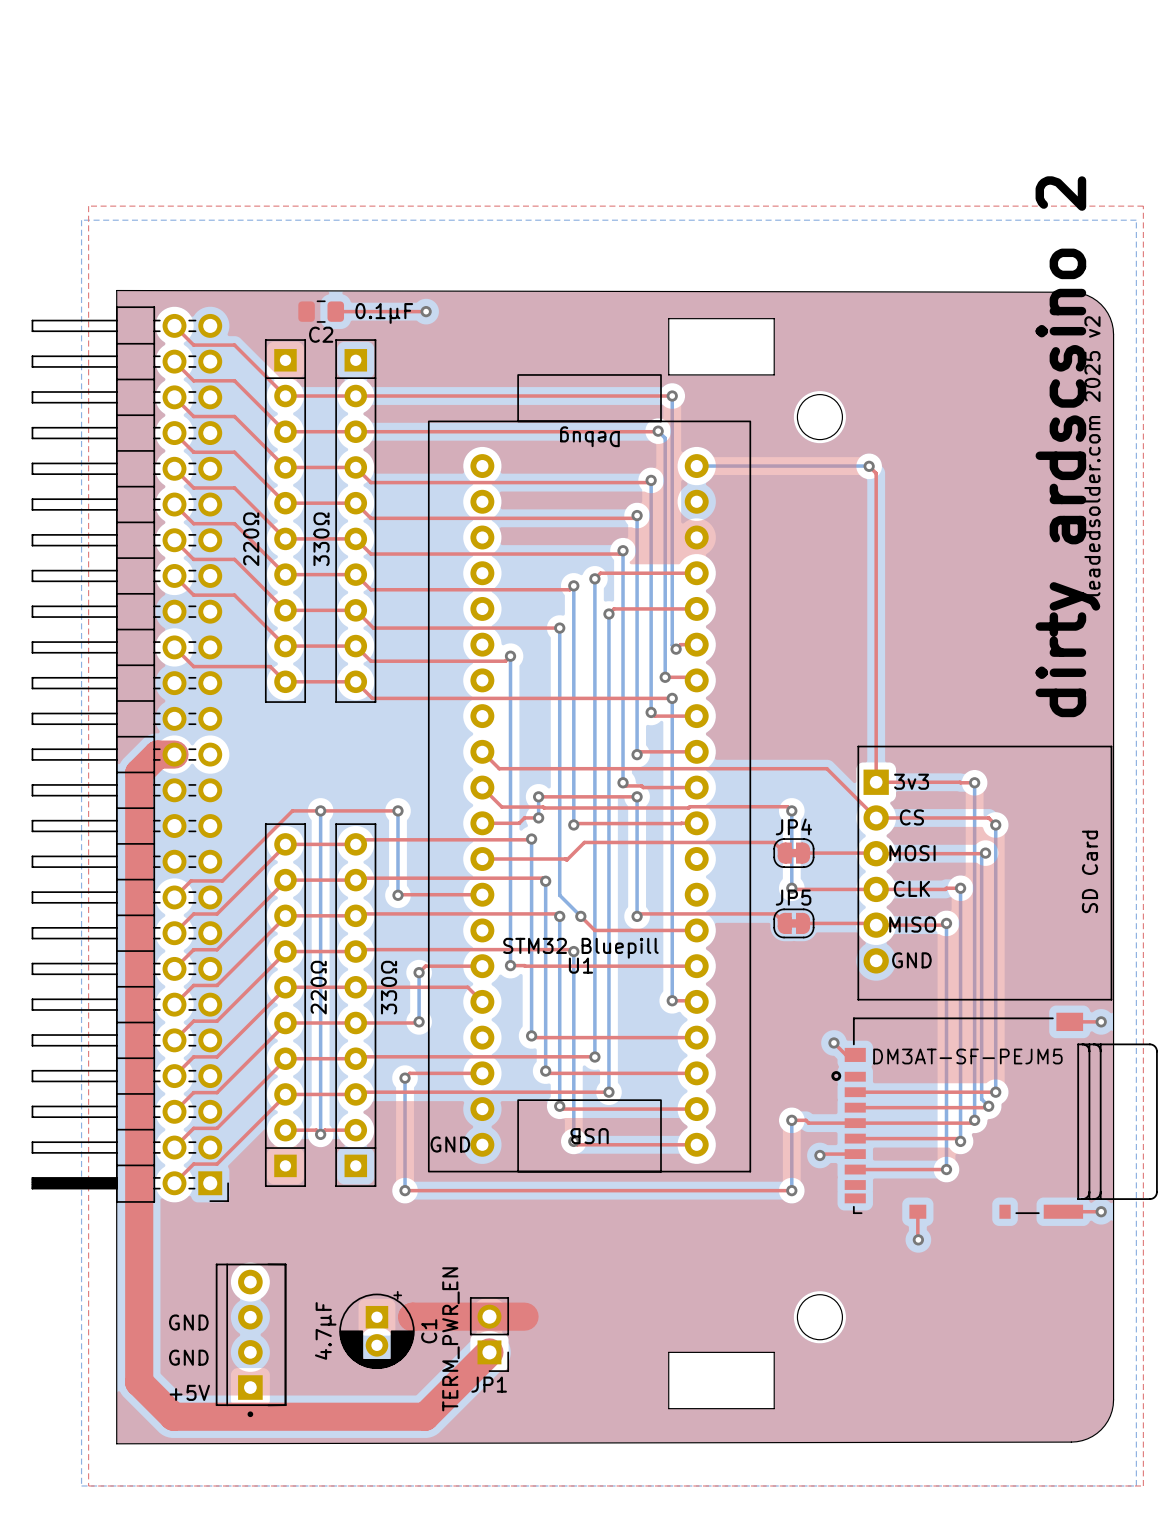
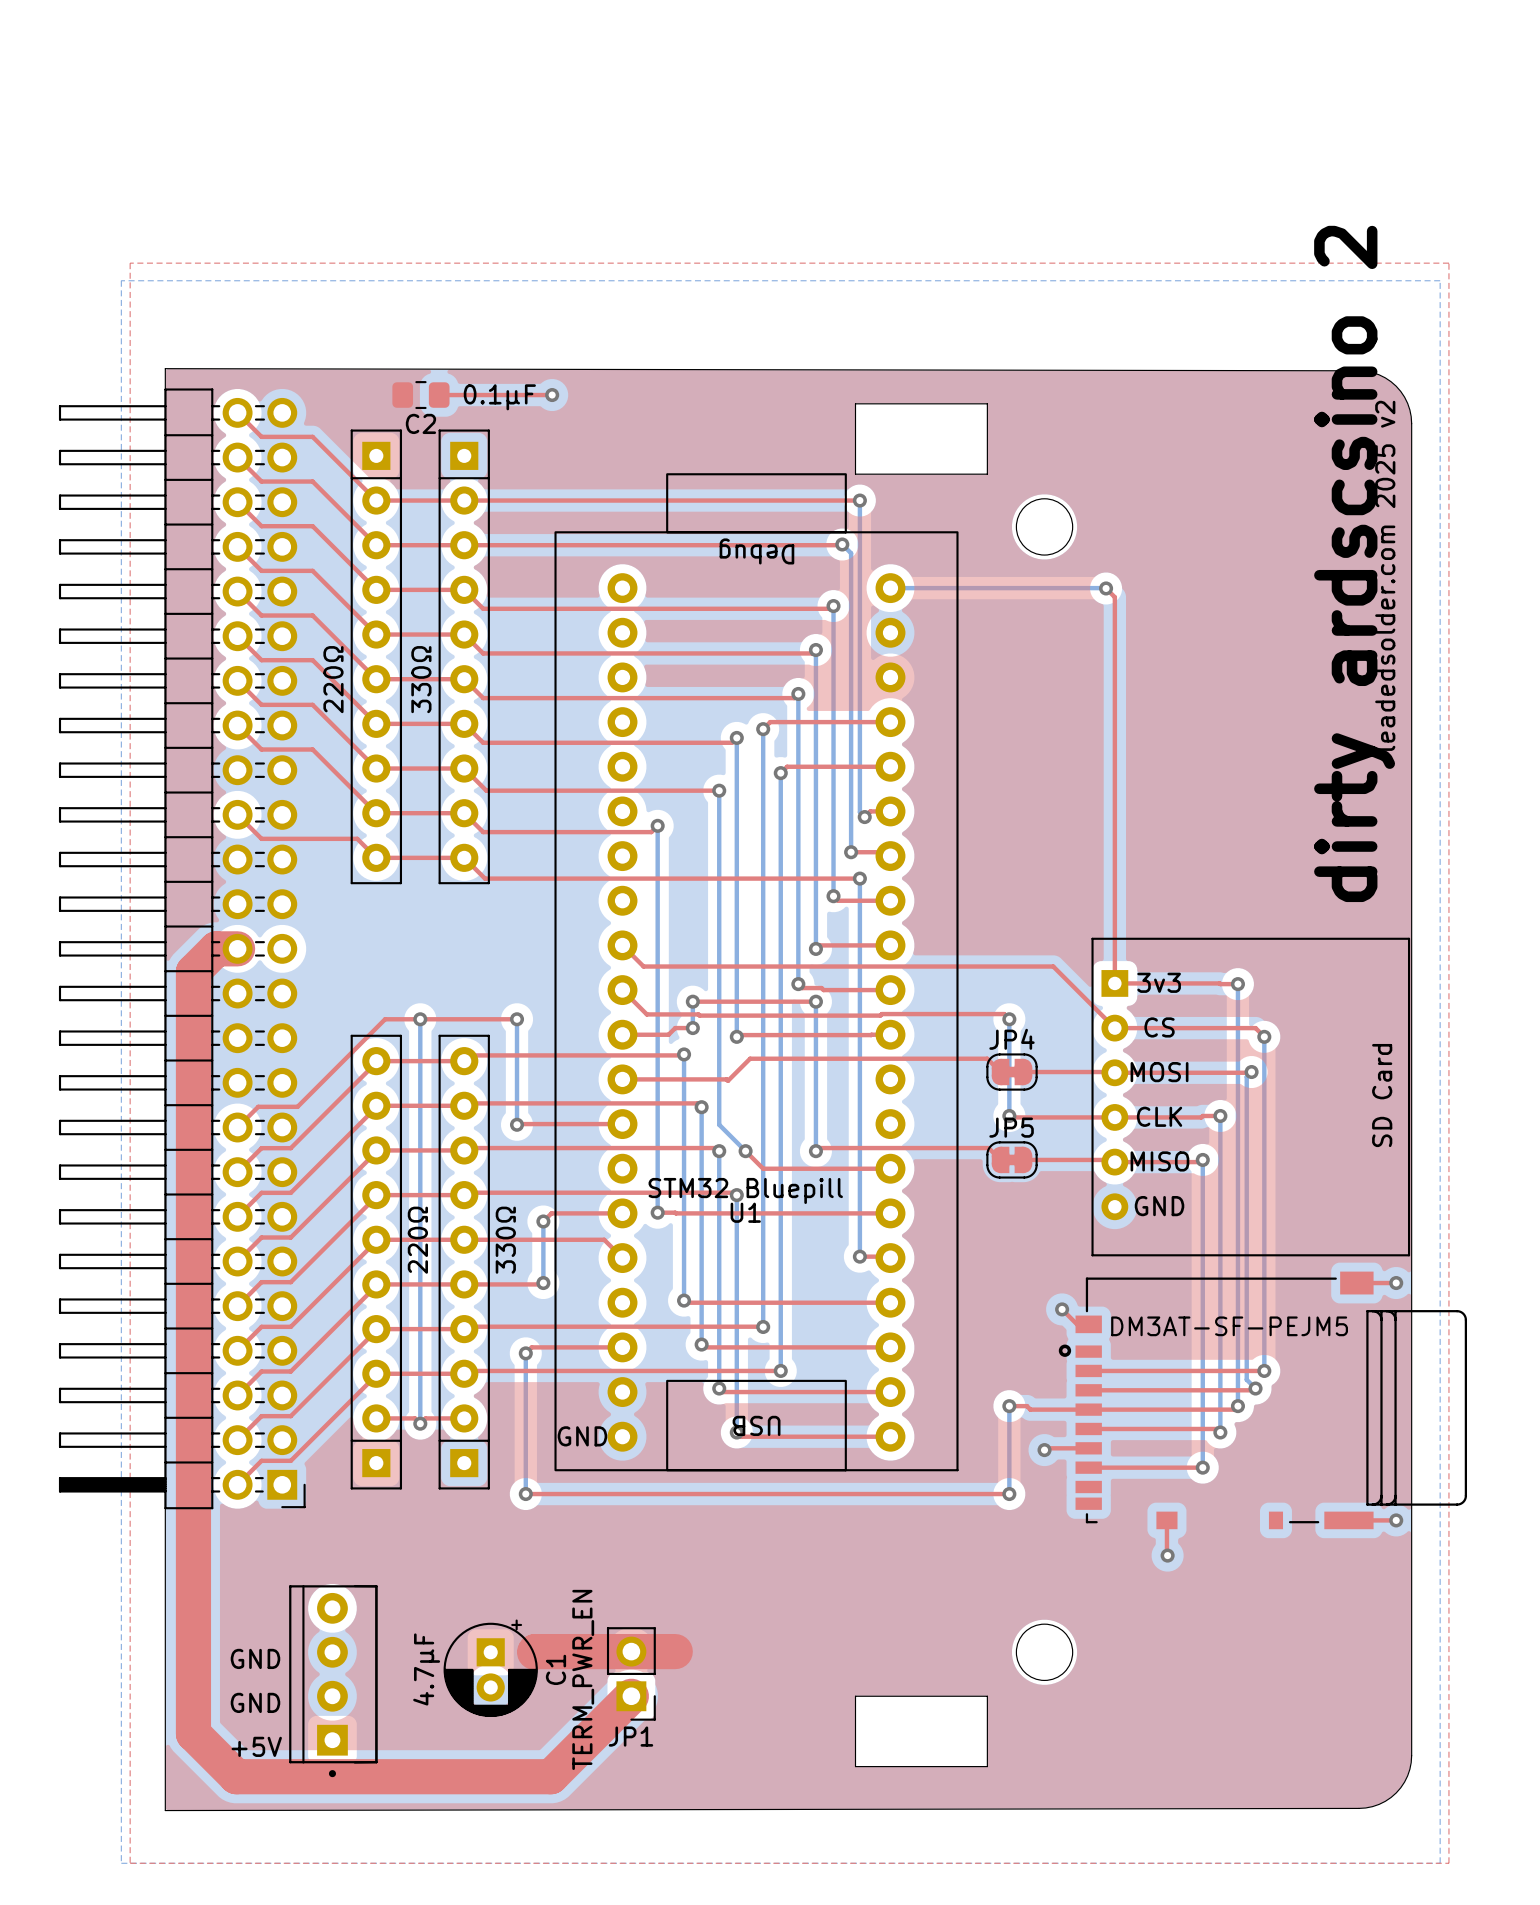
part footprint: [857, 745, 1113, 1001] -> [1091, 937, 1411, 1257]

